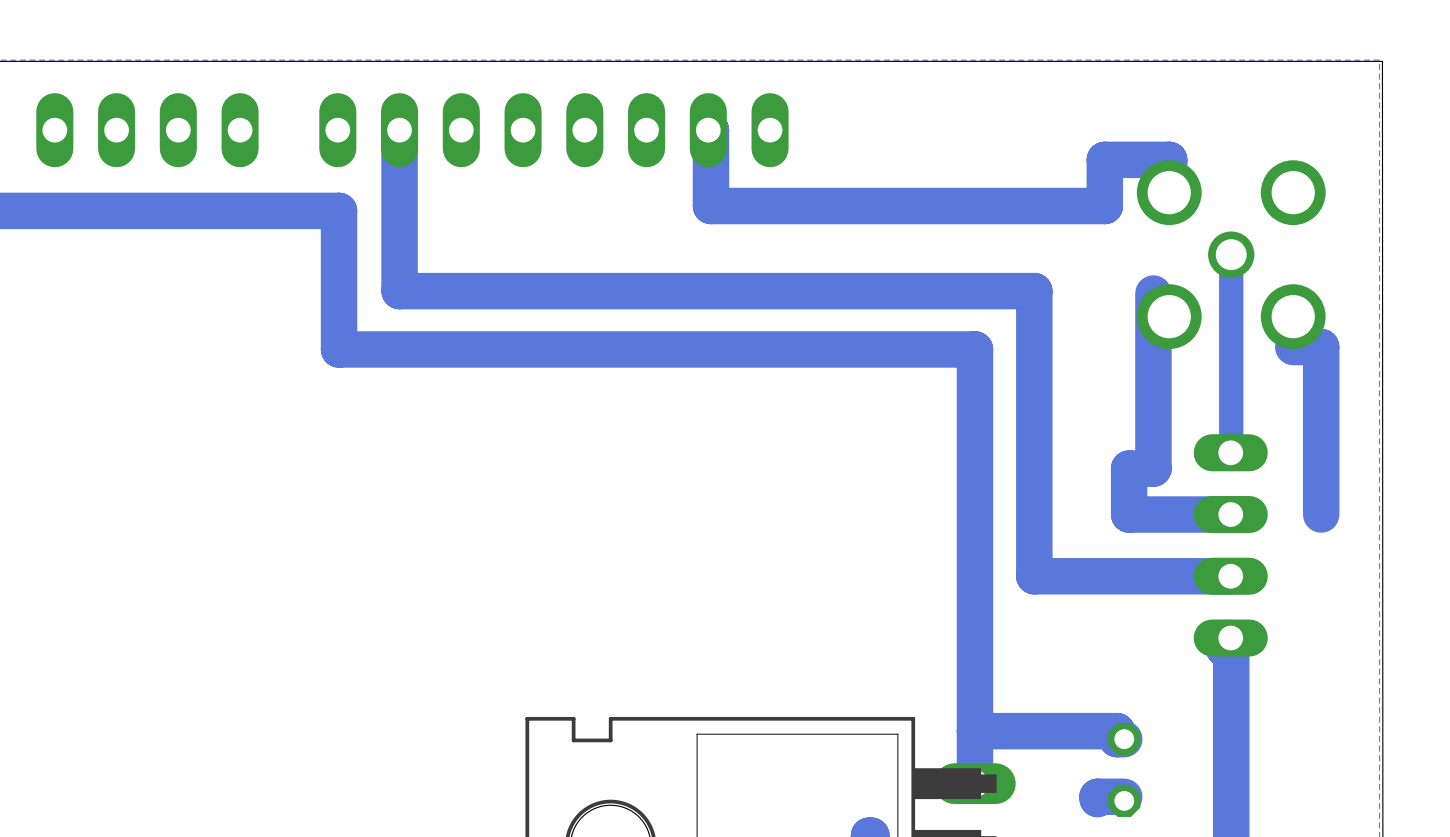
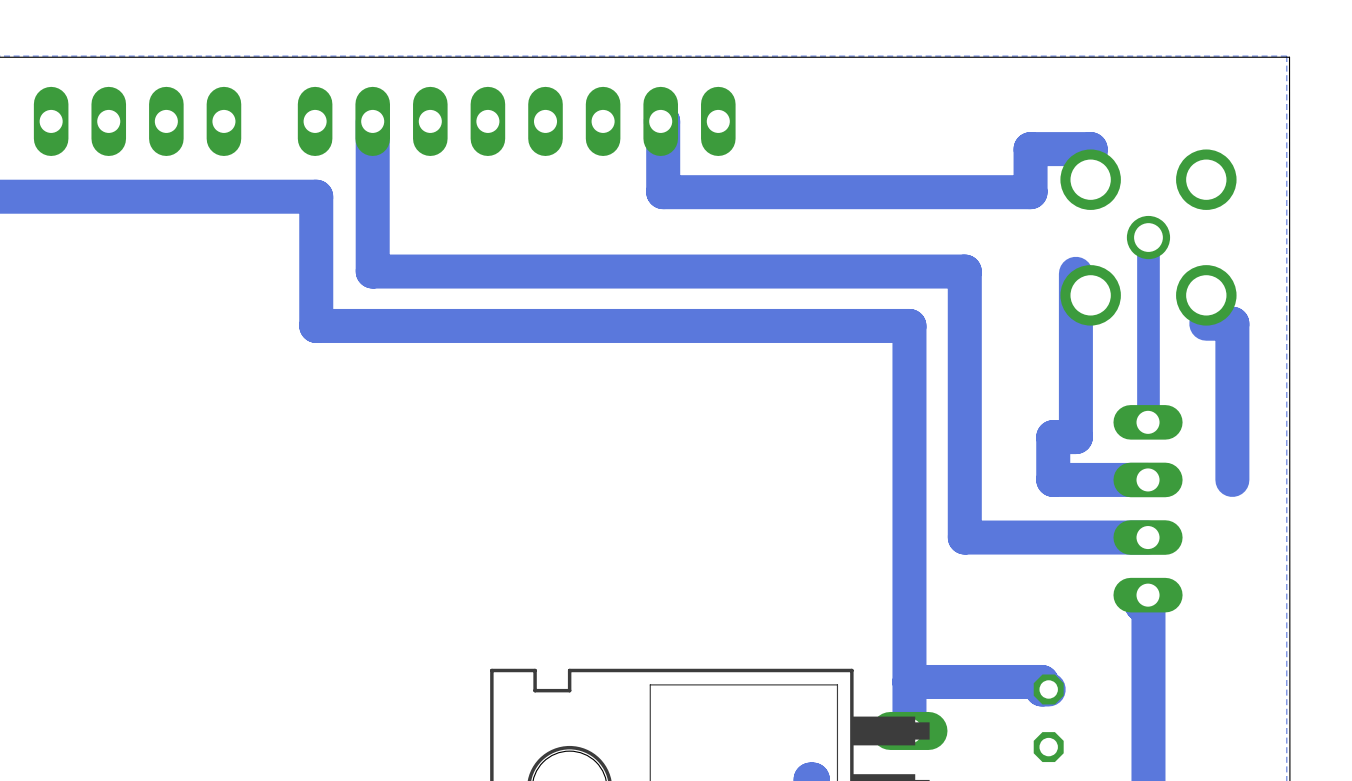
track: (1124, 796) (1097, 796) (1097, 799) -> none

